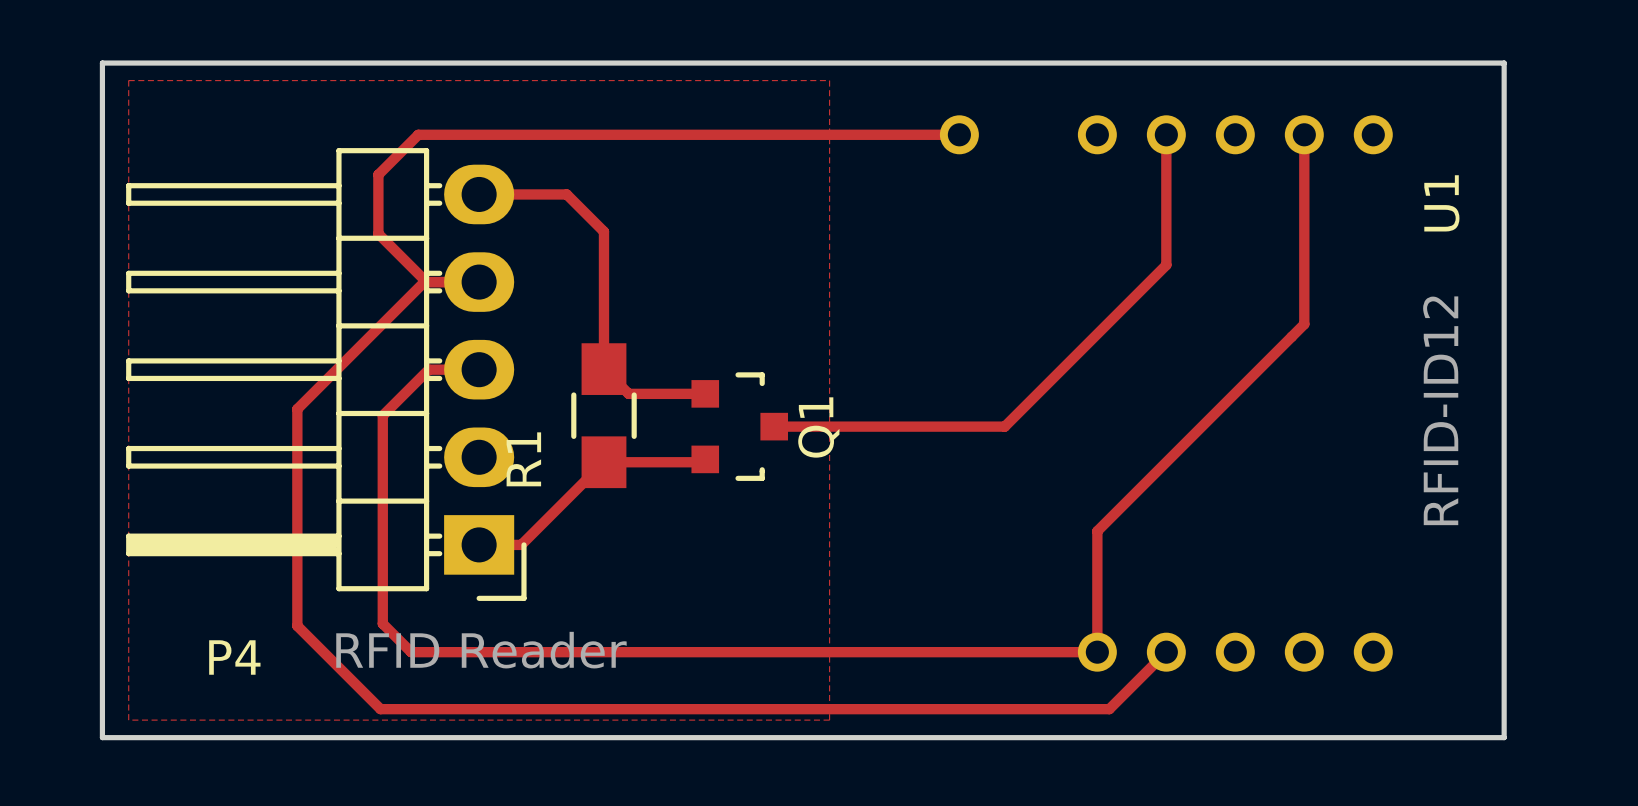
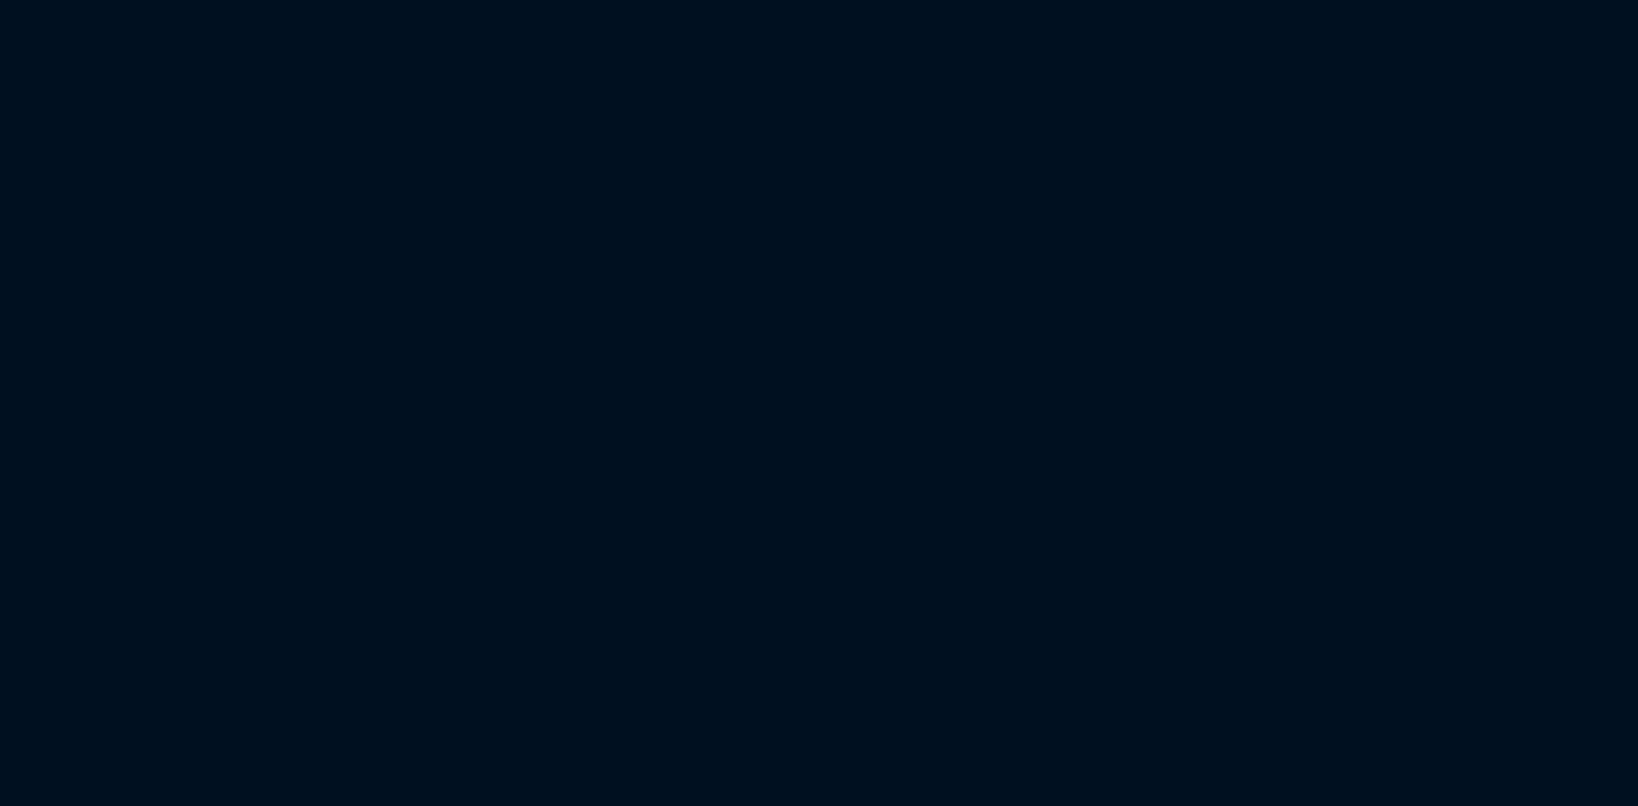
board edge: (102, 63) (102, 737) (1504, 737) (1504, 63) (102, 63) -> none
zone outline: (128, 80) (128, 720) (829, 720) (829, 80) (128, 80) -> none
track: (1166, 134) (1166, 265) (1004, 426) (774, 426) -> none
track: (1304, 134) (1304, 324) (1097, 531) (1097, 652) (411, 652) (382, 623) (382, 415) (428, 369) (479, 369) -> none
track: (958, 135) (418, 134) (378, 174) (378, 233) (426, 282) -> none
track: (479, 194) (566, 194) (603, 231) (603, 369) (628, 393) (705, 393) -> none
track: (479, 282) (424, 282) (297, 409) (297, 625) (380, 709) (1109, 709) (1166, 652) -> none
P4: RFID Reader (326, 374) -> none
U1: RFID-ID12 (1166, 393) -> none
R1: (603, 415) -> none
Q1: (739, 426) -> none
track: (705, 459) (702, 462) (603, 462) (521, 544) (479, 544) -> none

